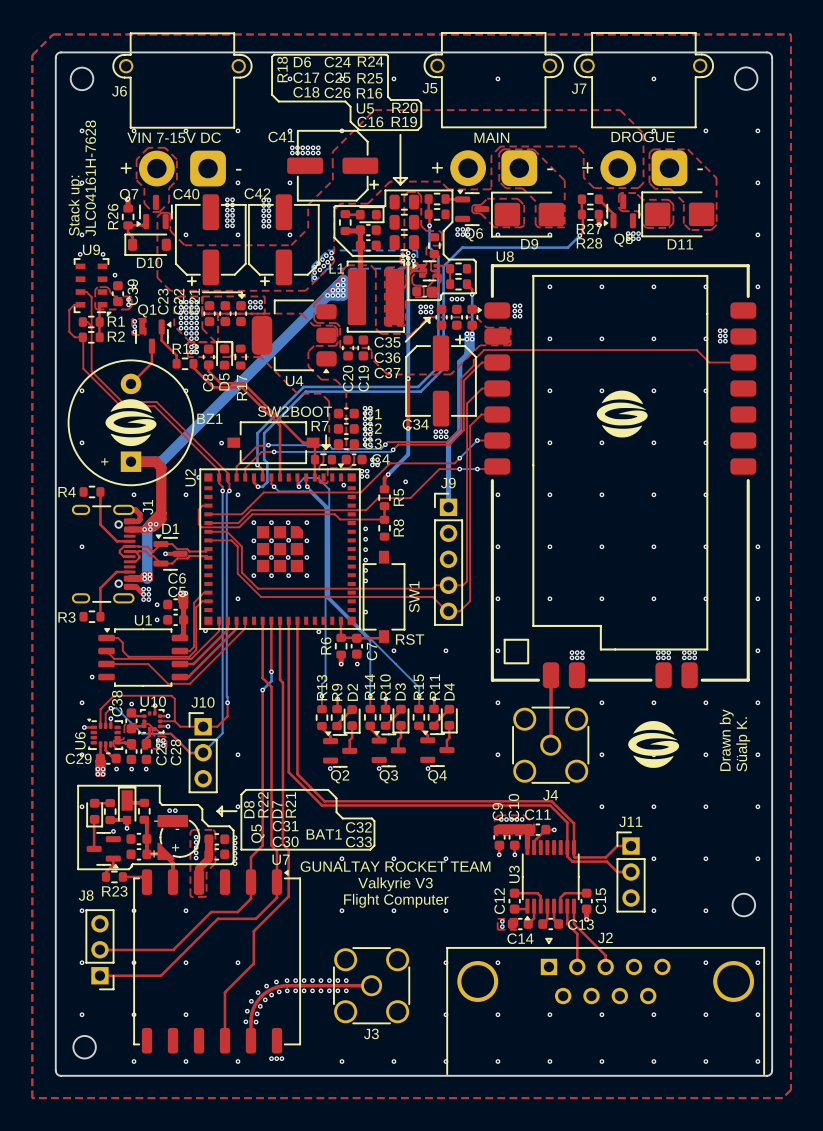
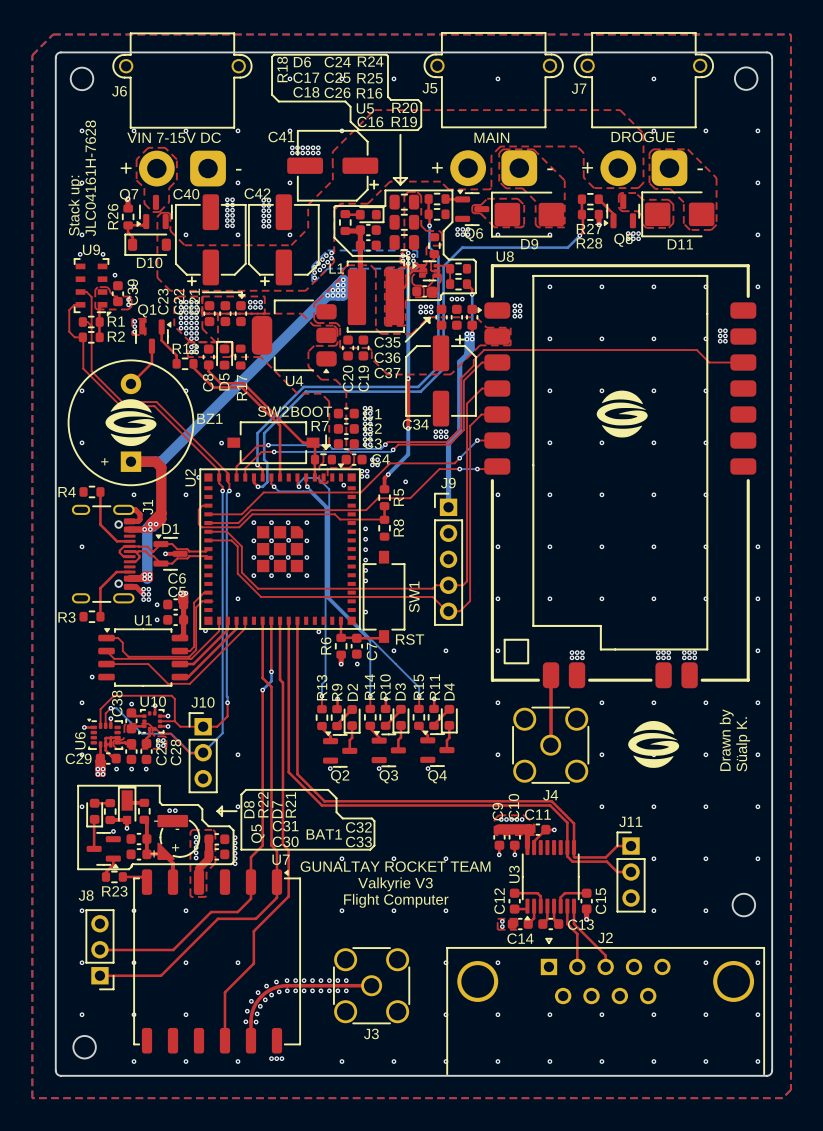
top track: none -> (110, 737) (110, 744) (105, 744) (105, 738)
top track: none -> (110, 737) (105, 738)
top track: none -> (117, 737) (110, 737)

